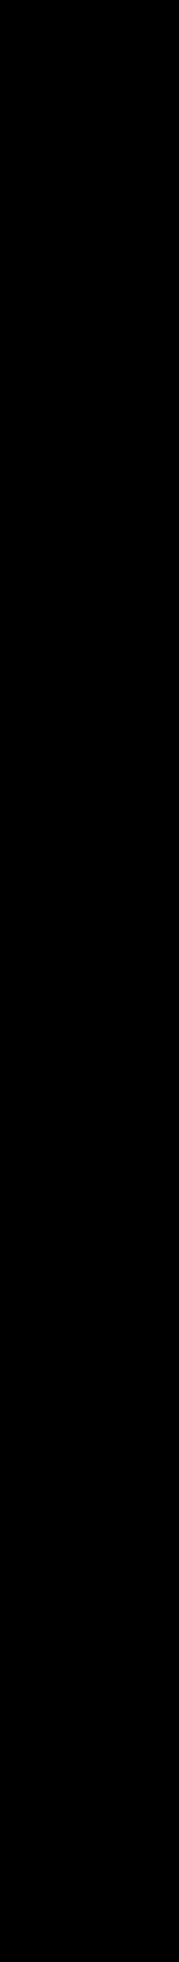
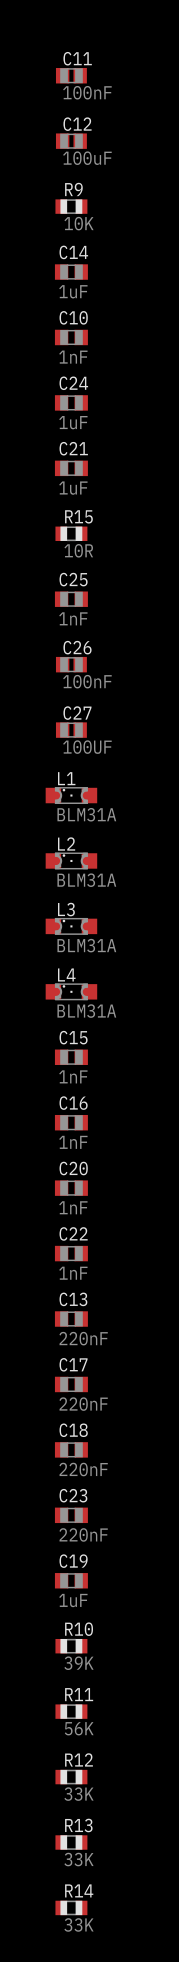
C11: none -> 100nF (71, 75)
C12: none -> 100uF (71, 141)
R9: none -> 10K (71, 206)
C14: none -> 1uF (71, 272)
C10: none -> 1nF (71, 337)
C24: none -> 1uF (71, 402)
C21: none -> 1uF (71, 468)
R15: none -> 10R (71, 533)
C25: none -> 1nF (71, 599)
C26: none -> 100nF (71, 664)
C27: none -> 100UF (71, 730)
L1: none -> BLM31A (71, 795)
L2: none -> BLM31A (71, 860)
L3: none -> BLM31A (71, 926)
L4: none -> BLM31A (71, 991)
C15: none -> 1nF (71, 1057)
C16: none -> 1nF (71, 1122)
C20: none -> 1nF (71, 1188)
C22: none -> 1nF (71, 1253)
C13: none -> 220nF (71, 1319)
C17: none -> 220nF (71, 1384)
C18: none -> 220nF (71, 1449)
C23: none -> 220nF (71, 1515)
C19: none -> 1uF (71, 1580)
R10: none -> 39K (71, 1646)
R11: none -> 56K (71, 1711)
R12: none -> 33K (71, 1777)
R13: none -> 33K (71, 1842)
R14: none -> 33K (71, 1907)

